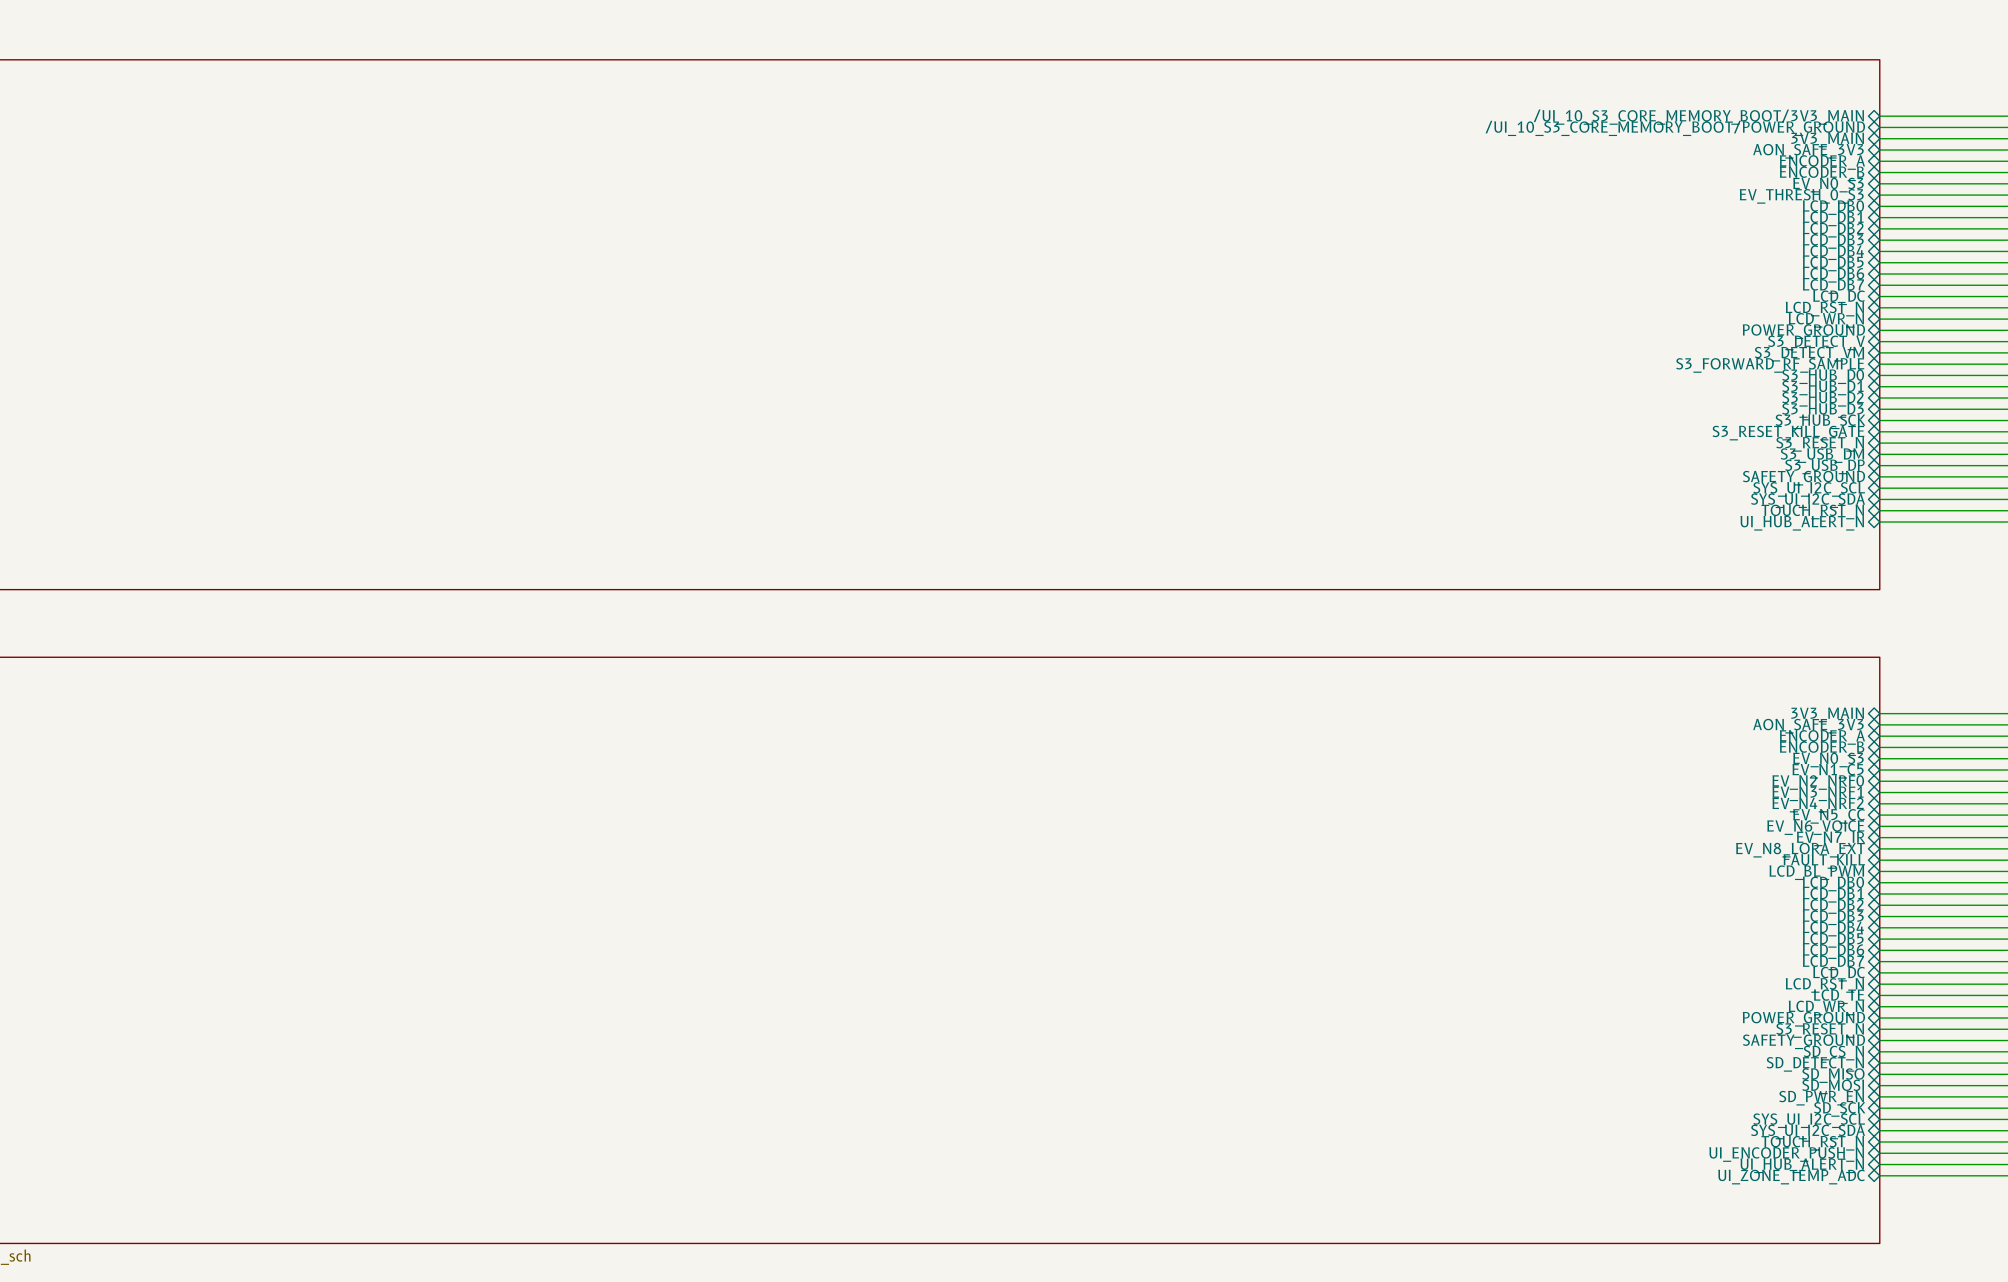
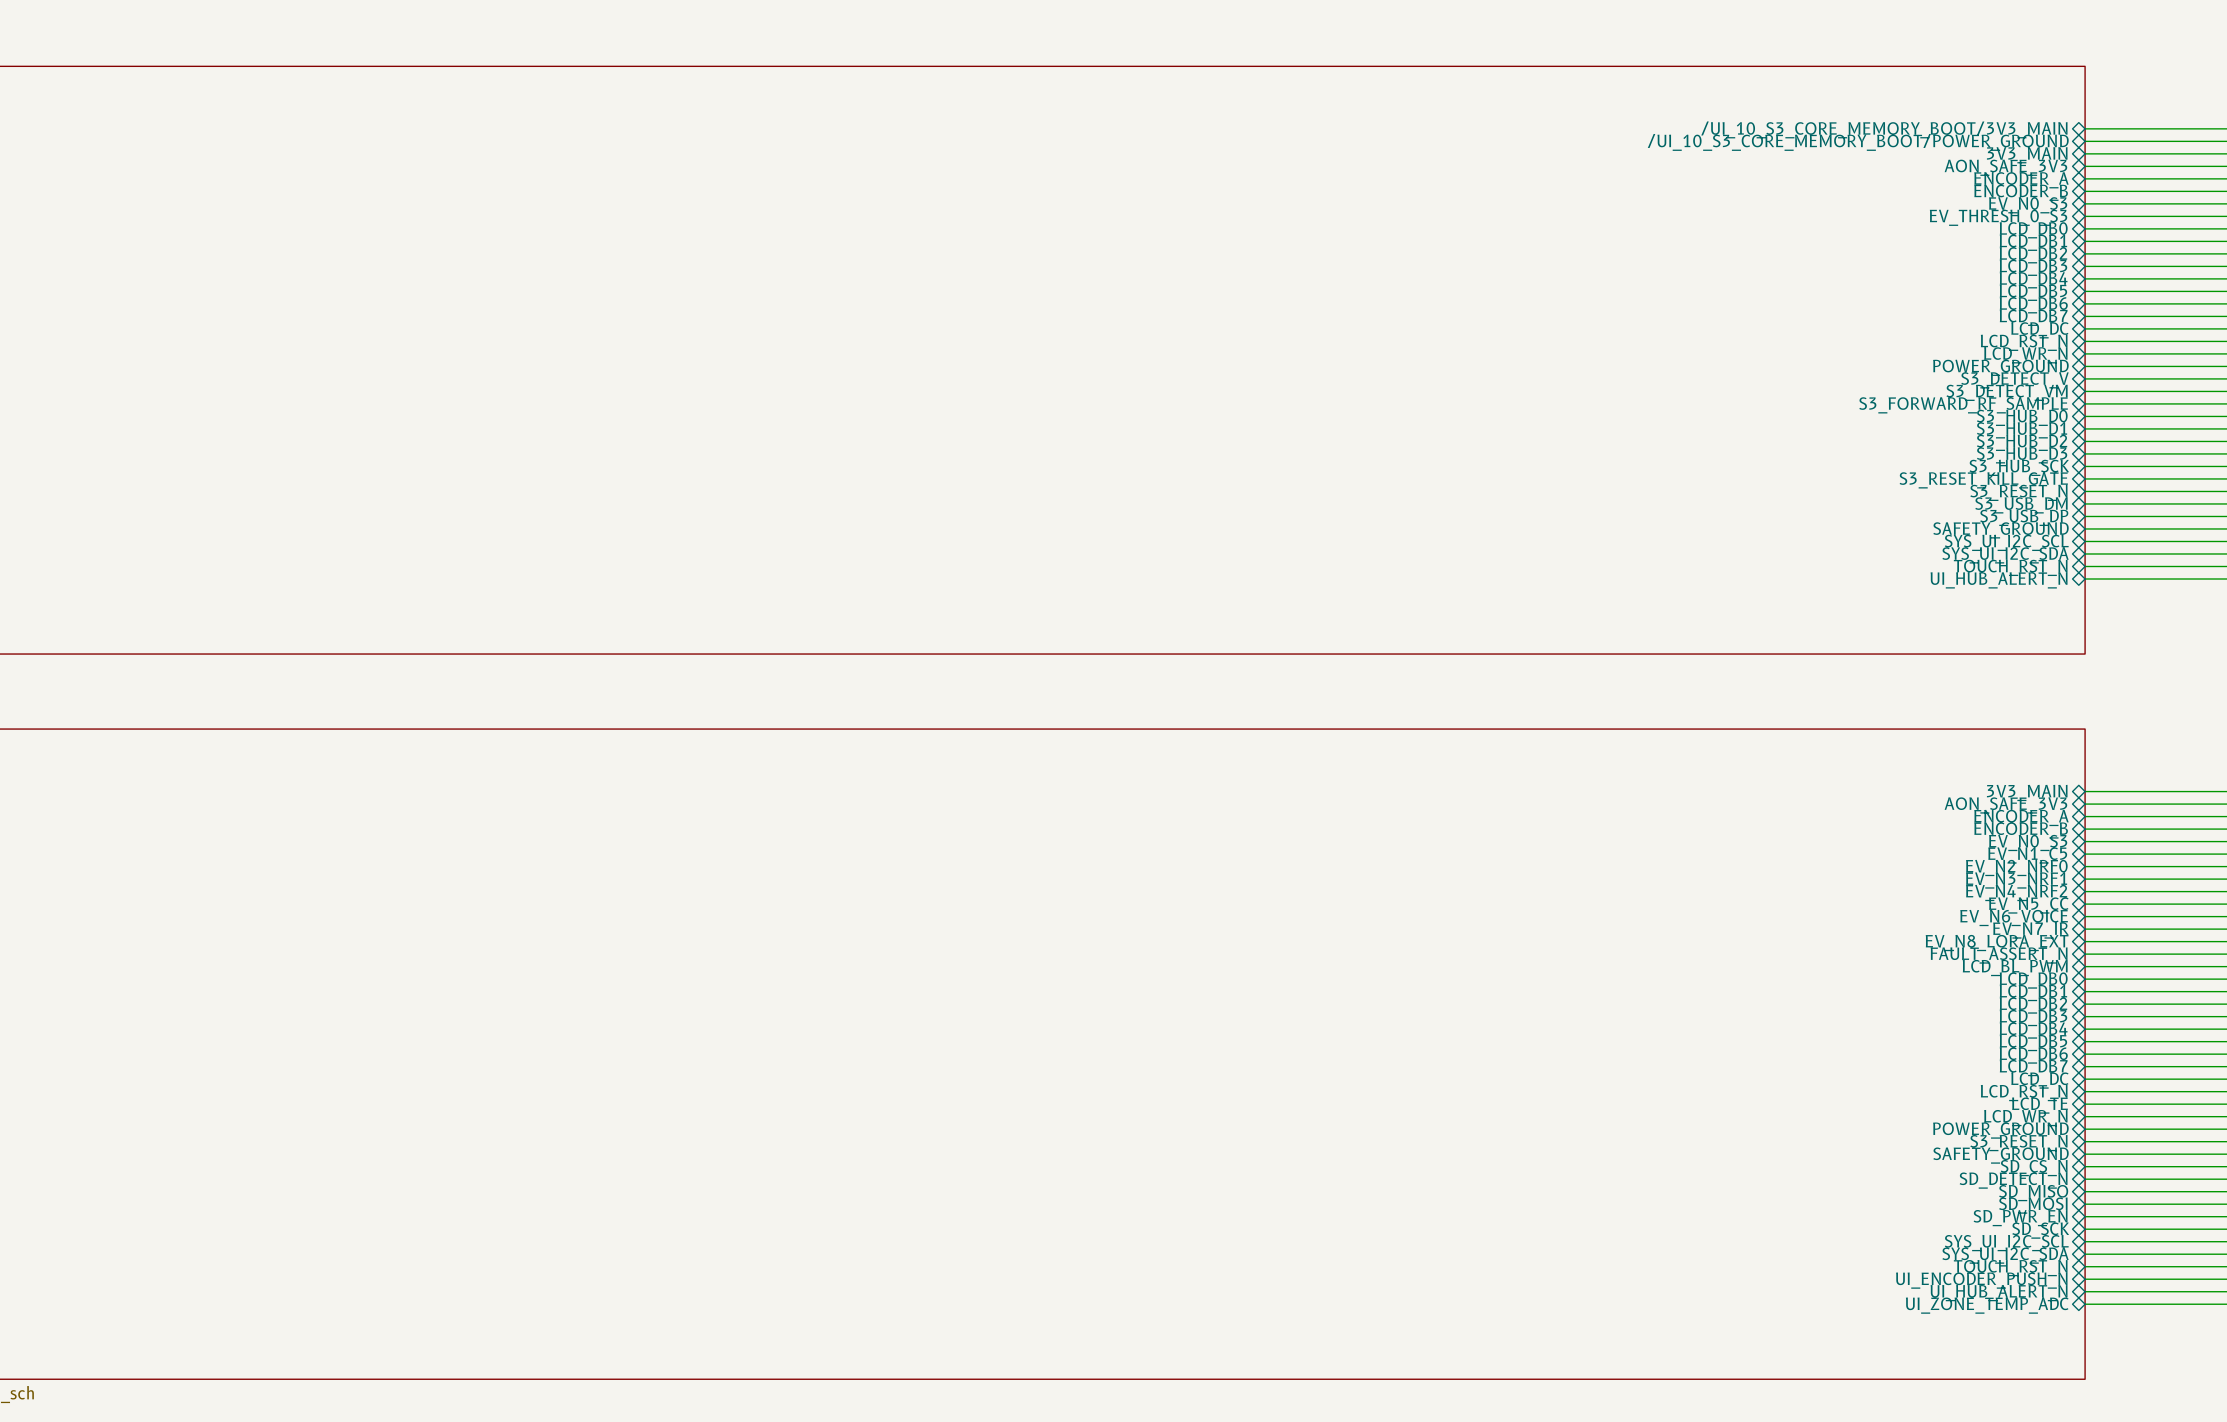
sheet pin: FAULT_KILL (1824, 861) -> FAULT_ASSERT_N (1999, 955)

